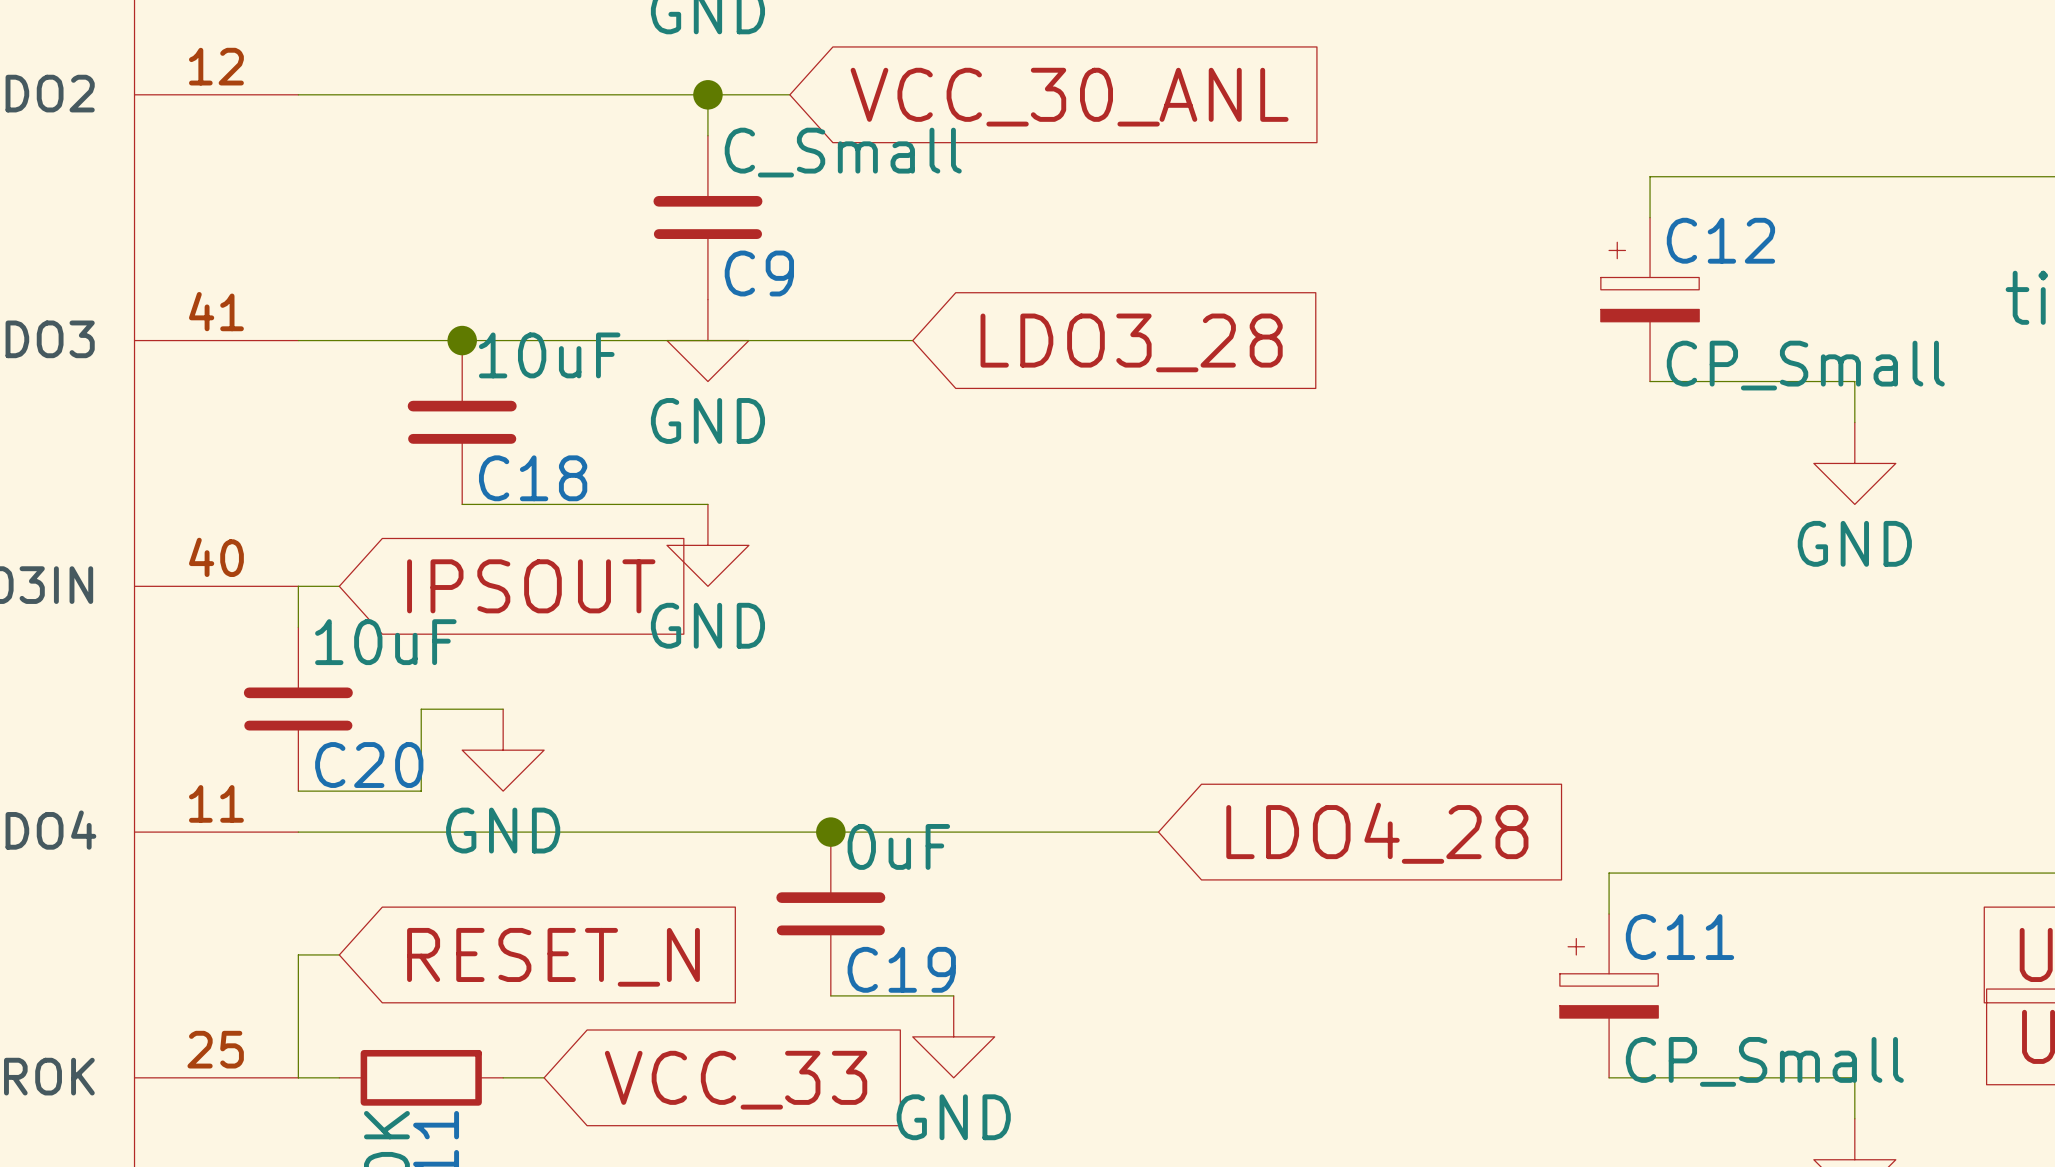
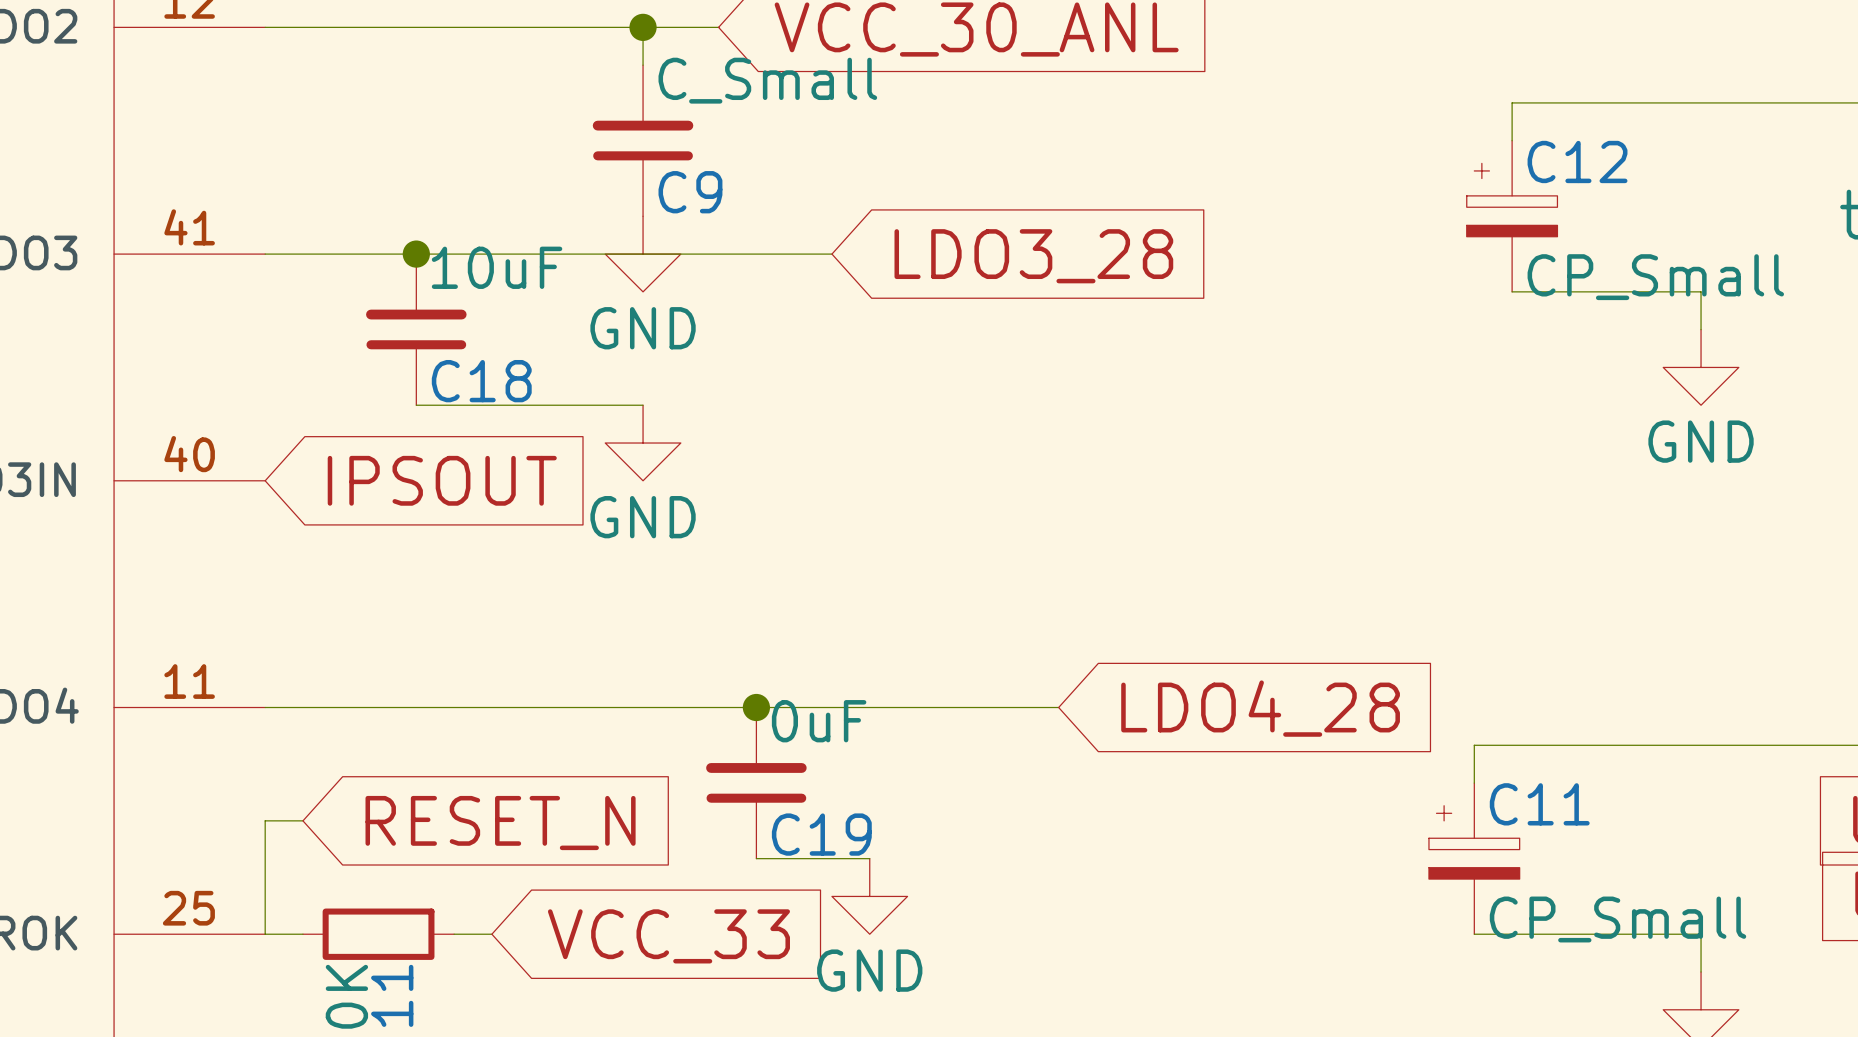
wire: (339, 586) (298, 586) (298, 627) -> none
global label position: IPSOUT (531, 586) -> IPSOUT (442, 480)
C20: 10uF (298, 709) -> none
wire: (503, 709) (421, 709) (421, 791) (298, 791) -> none
power symbol: GND (503, 750) -> none

